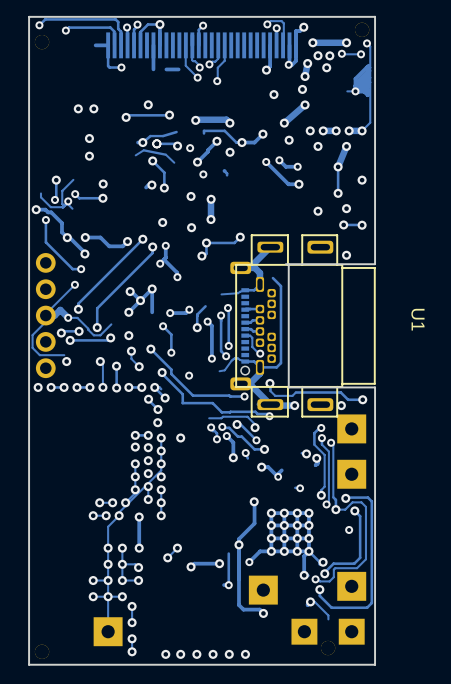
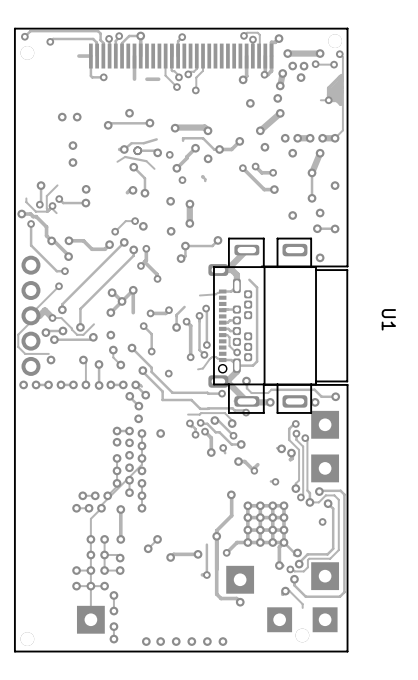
track: none -> (135, 221) (125, 221) (115, 231)
via: none -> (135, 221)
via: none -> (115, 231)

